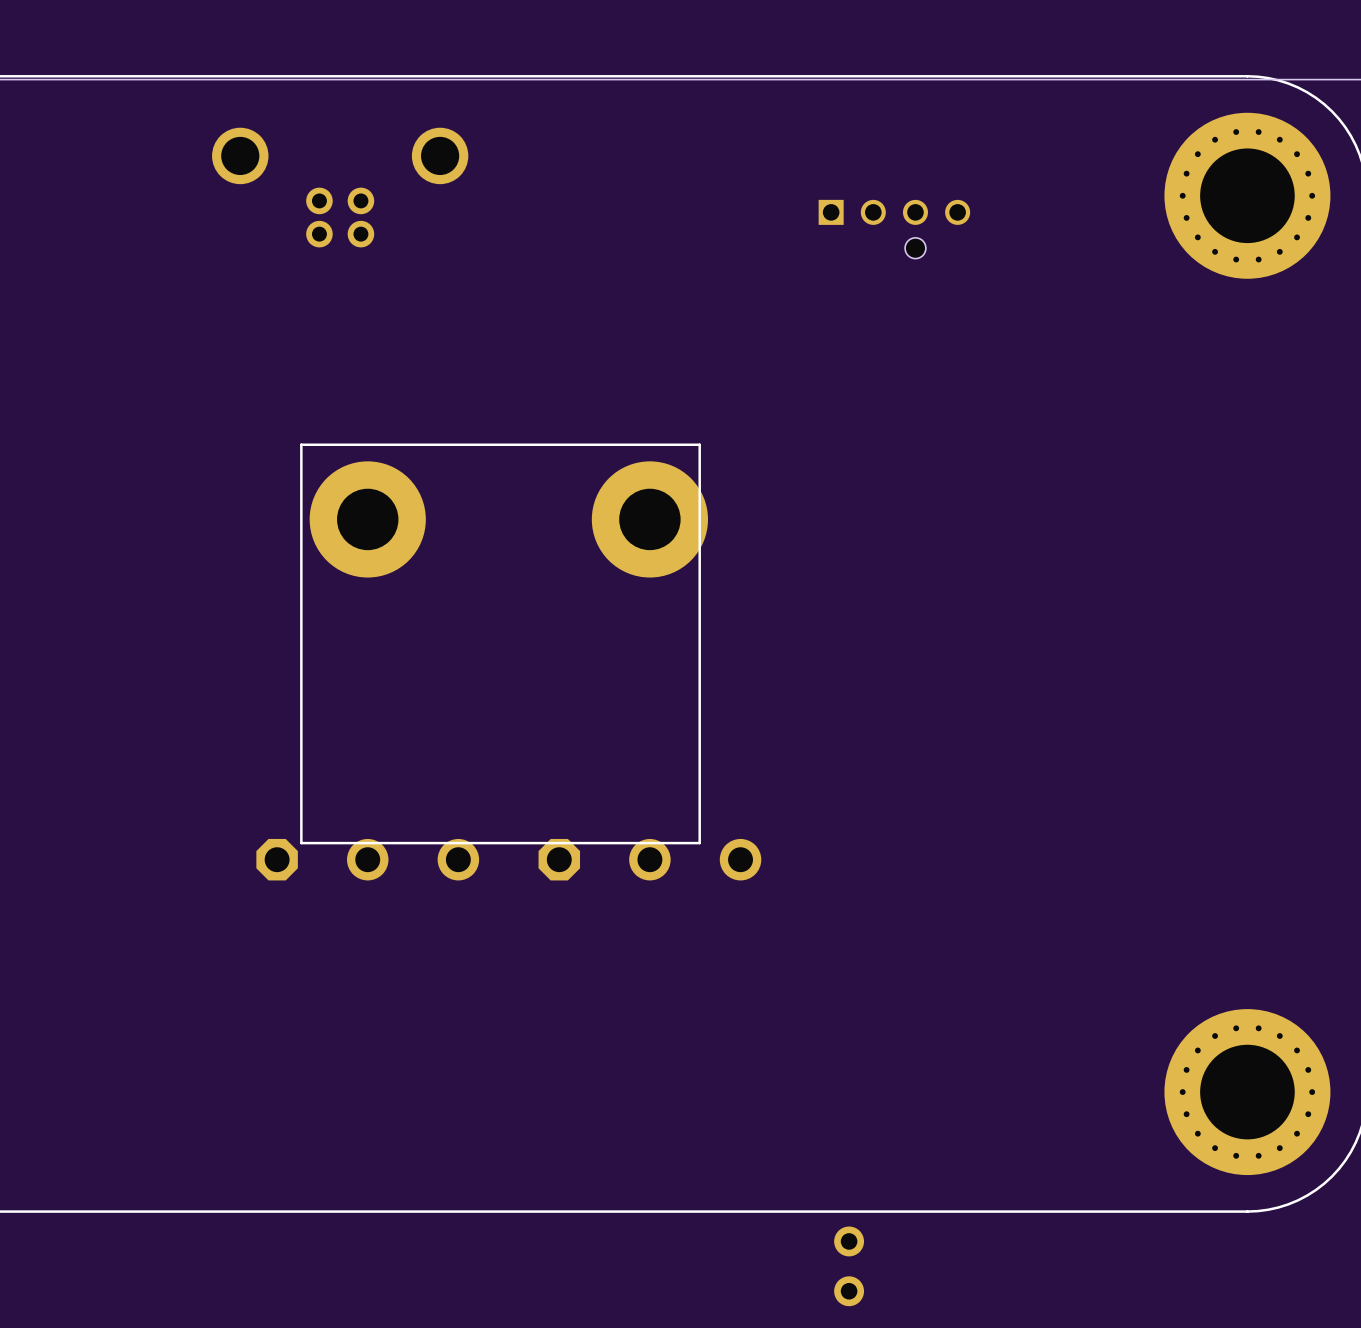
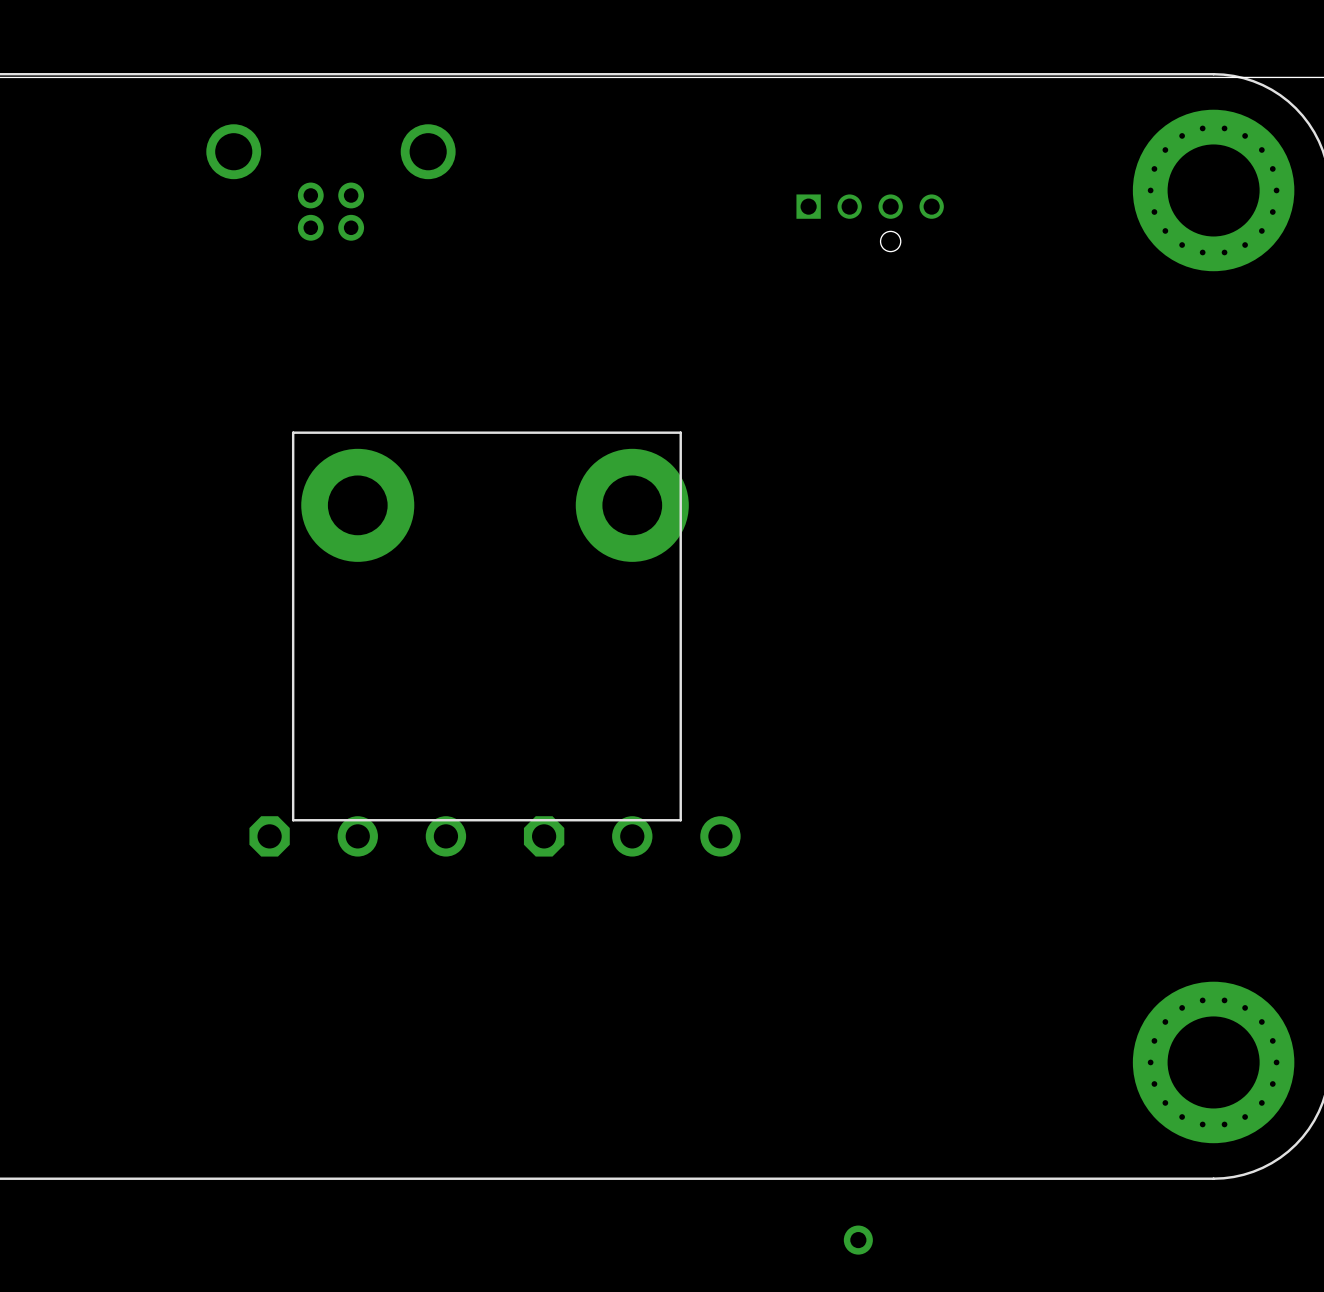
part: (849, 1241) -> none
part: none -> (858, 1240)
part: (849, 1291) -> none

